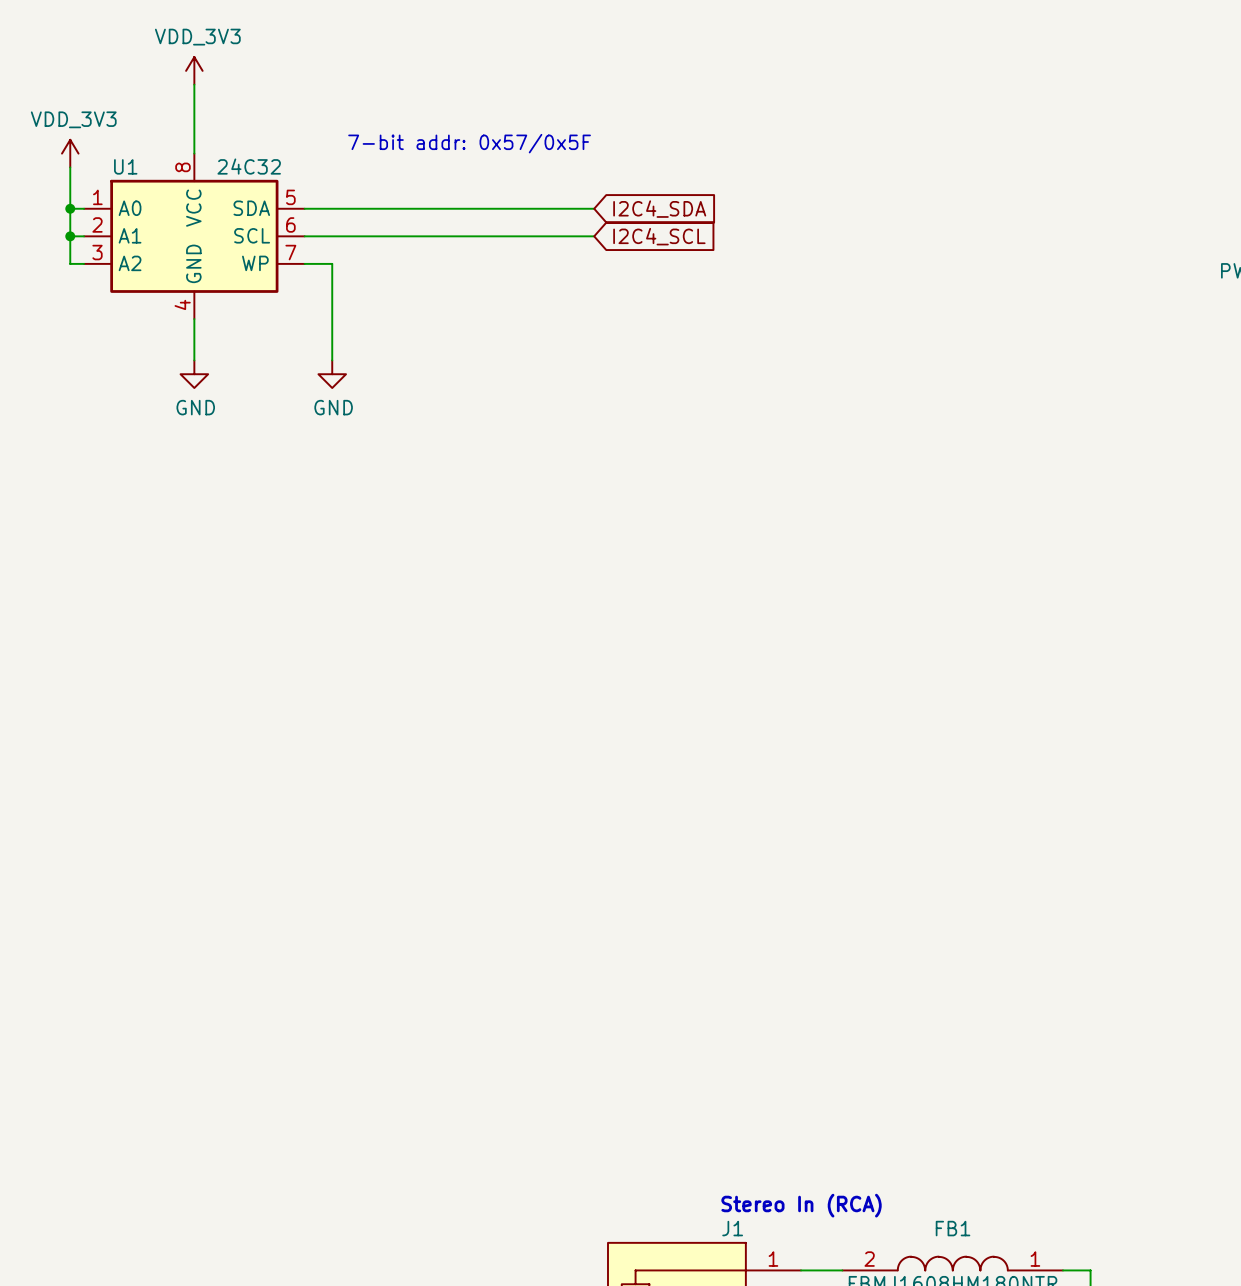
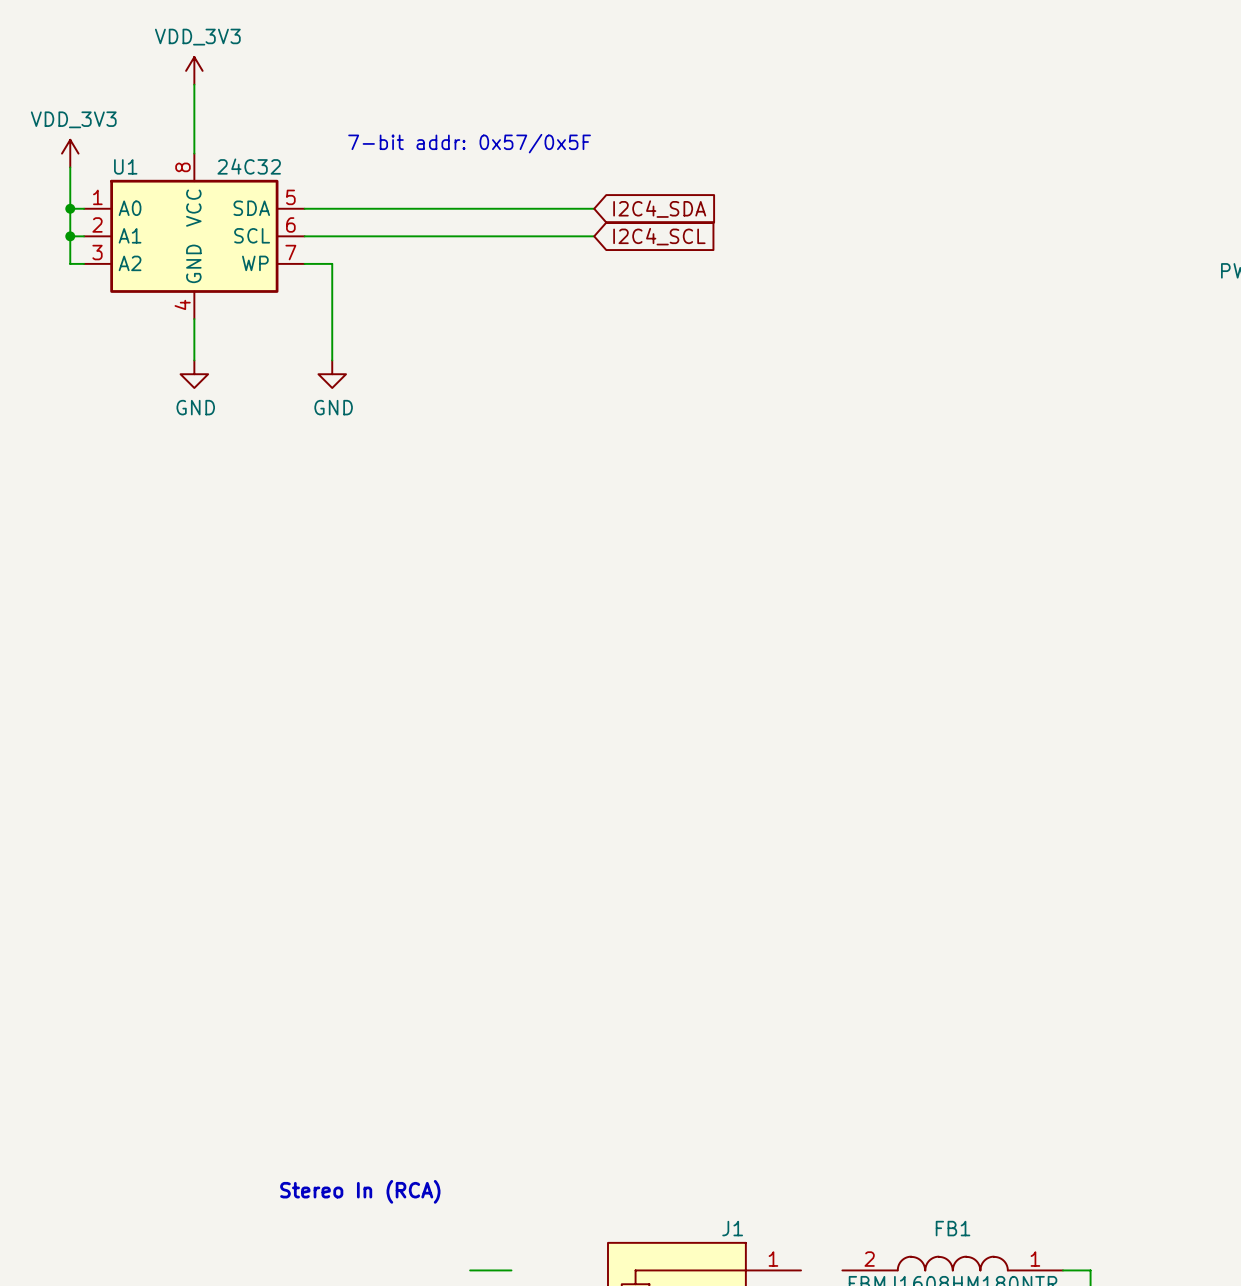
text: none -> Stereo In (RCA) (360, 1191)
text: Stereo In (RCA) (801, 1205) -> none
wire: none -> (470, 1270) (511, 1270)
wire: (801, 1270) (842, 1270) -> none

